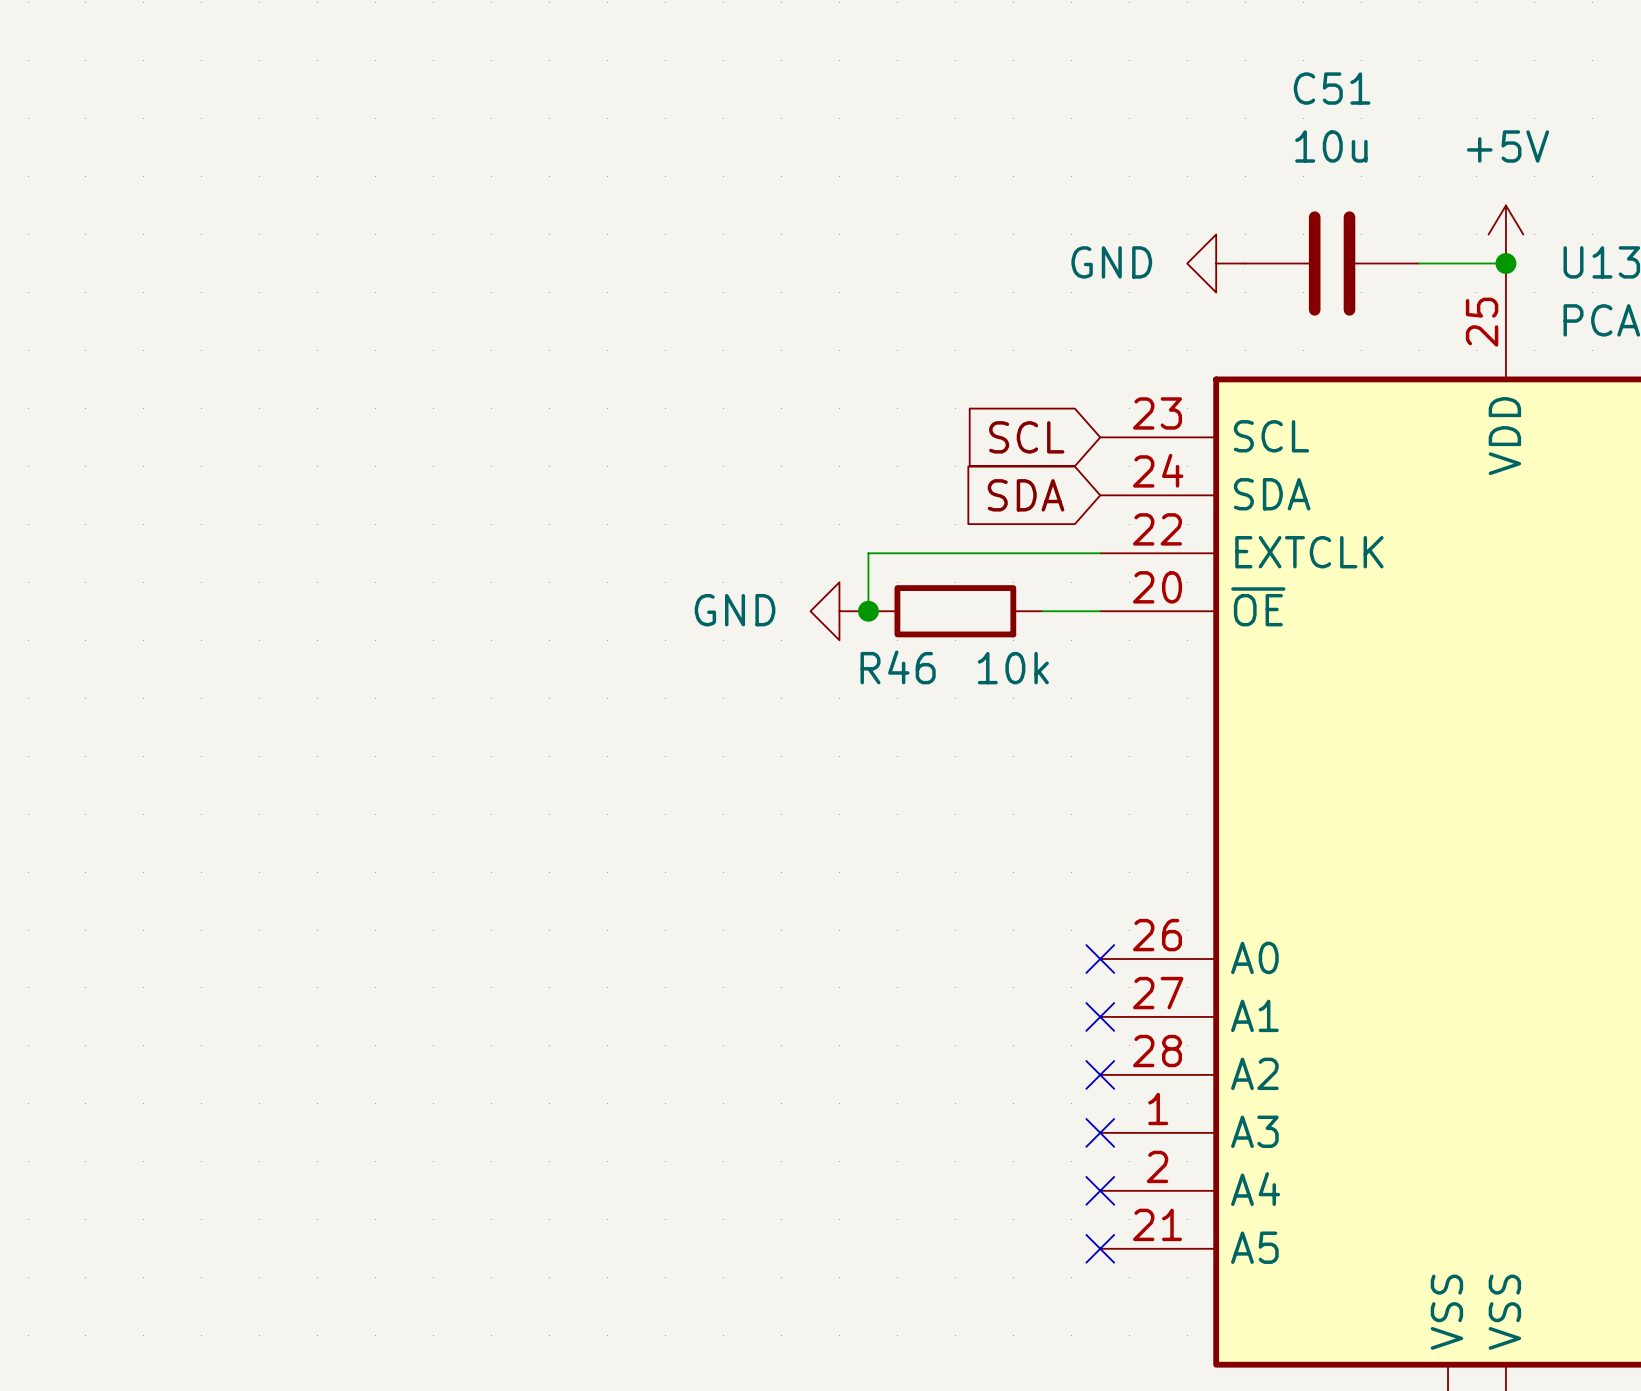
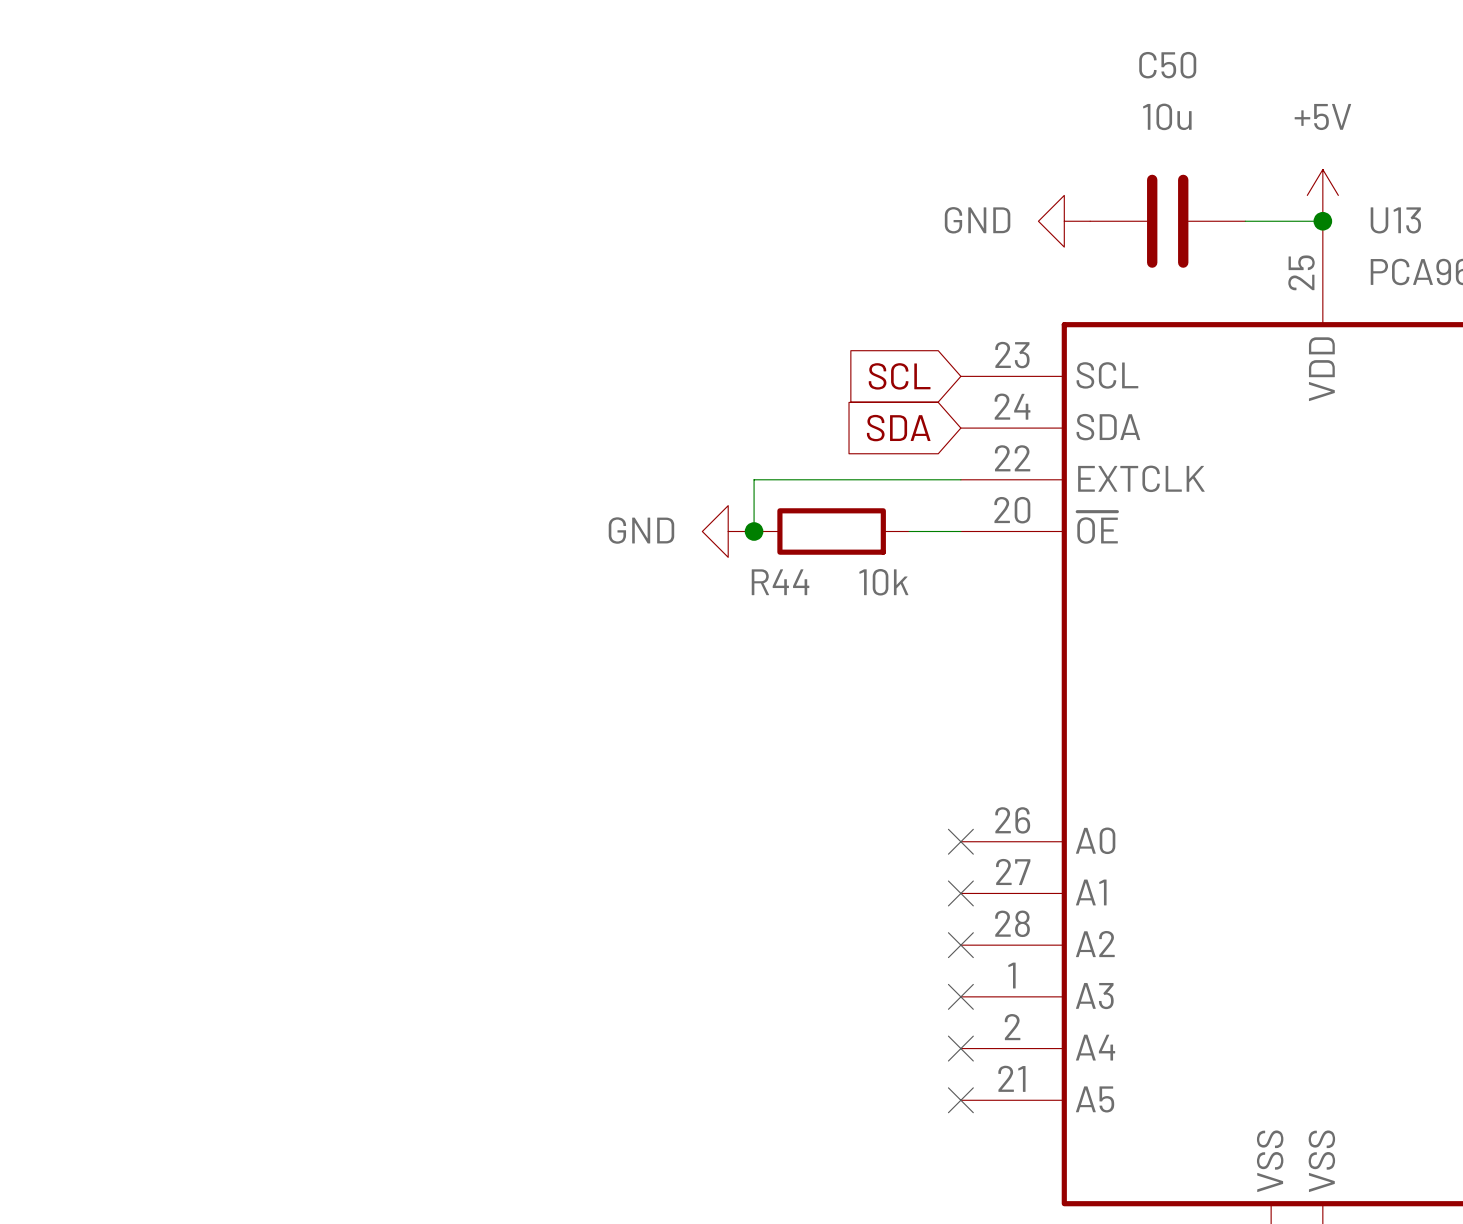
C51 name: C51 (1332, 88) -> C50 (1167, 65)
R46 name: R46 (898, 667) -> R44 (780, 582)

